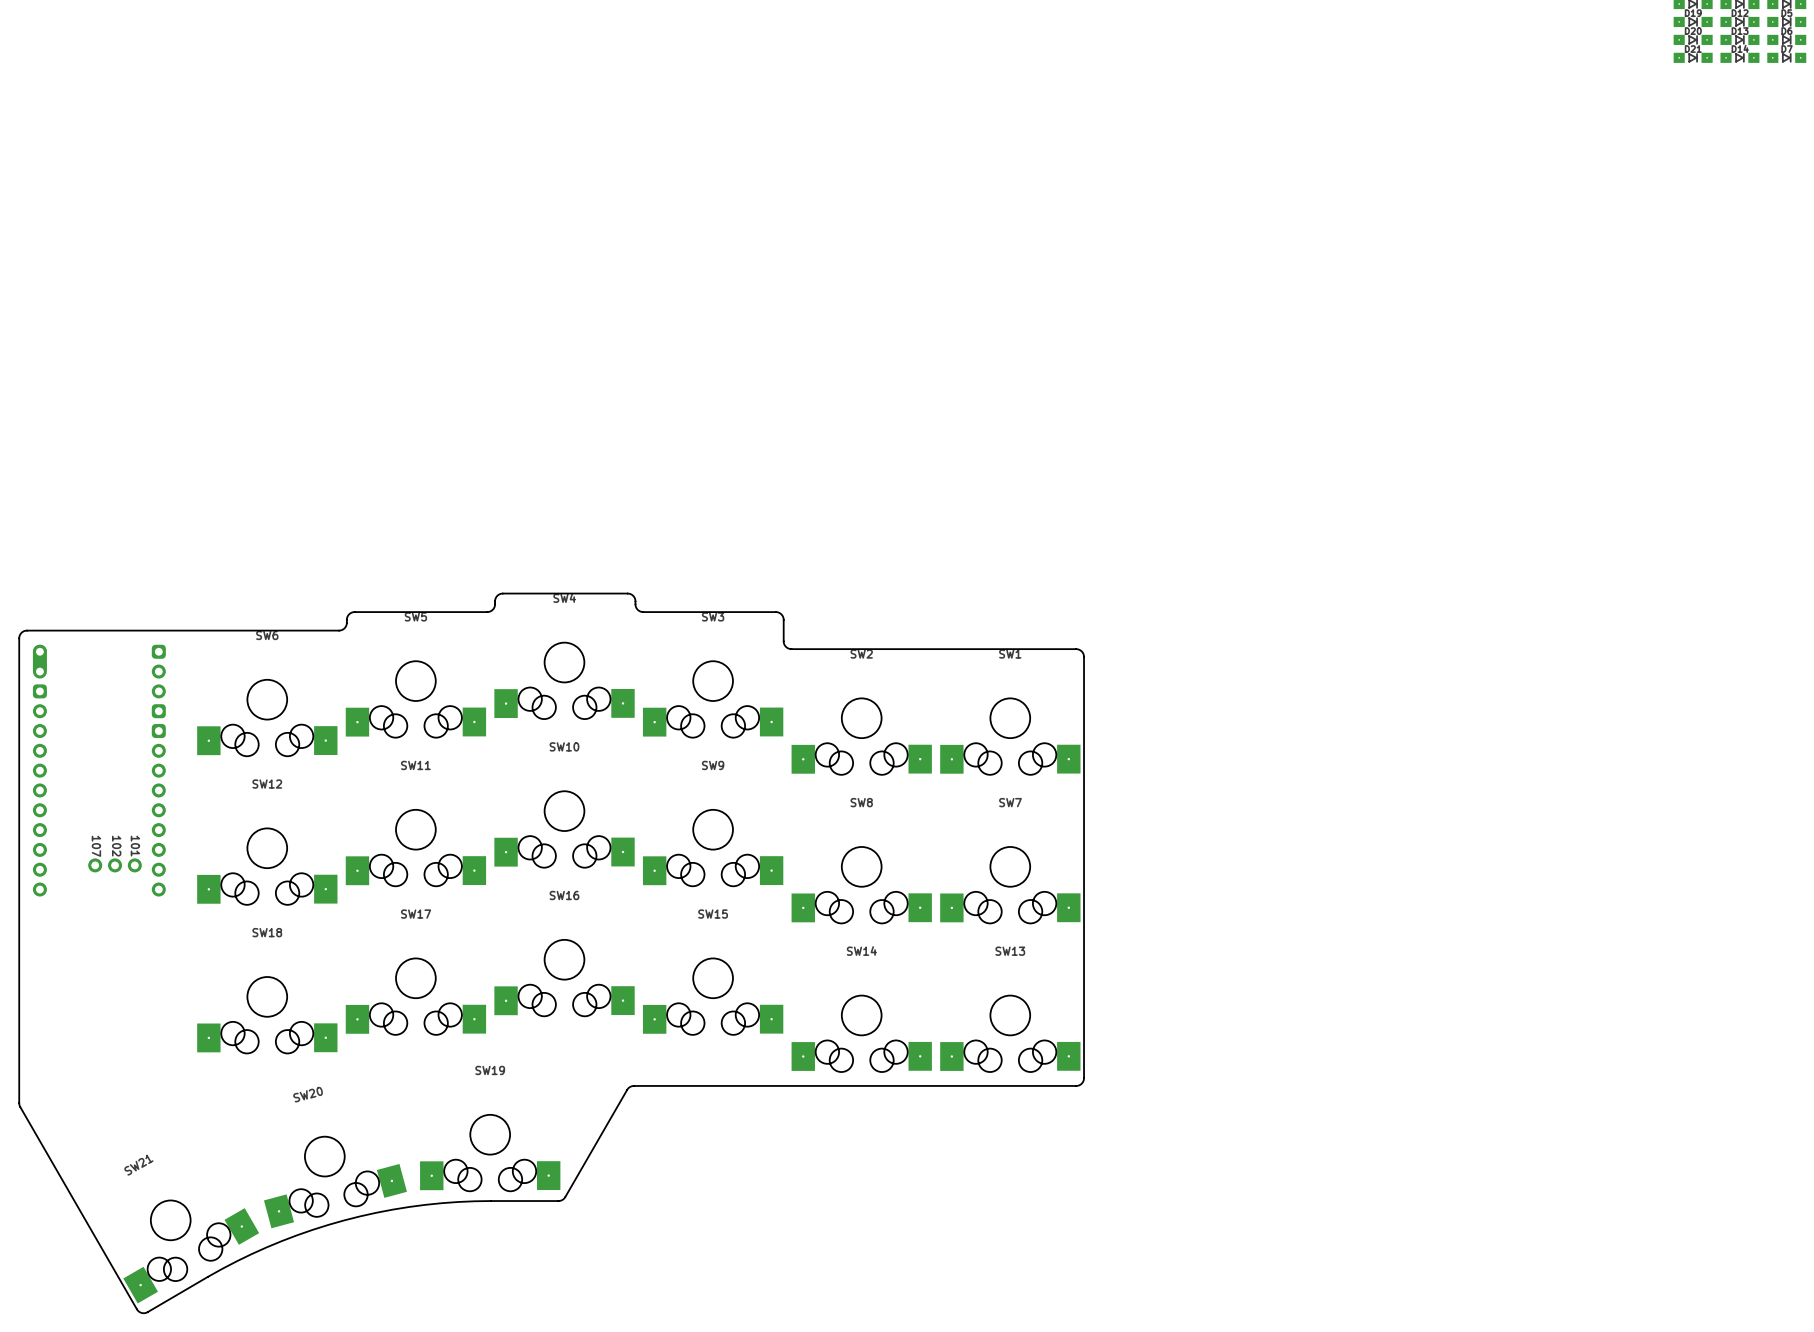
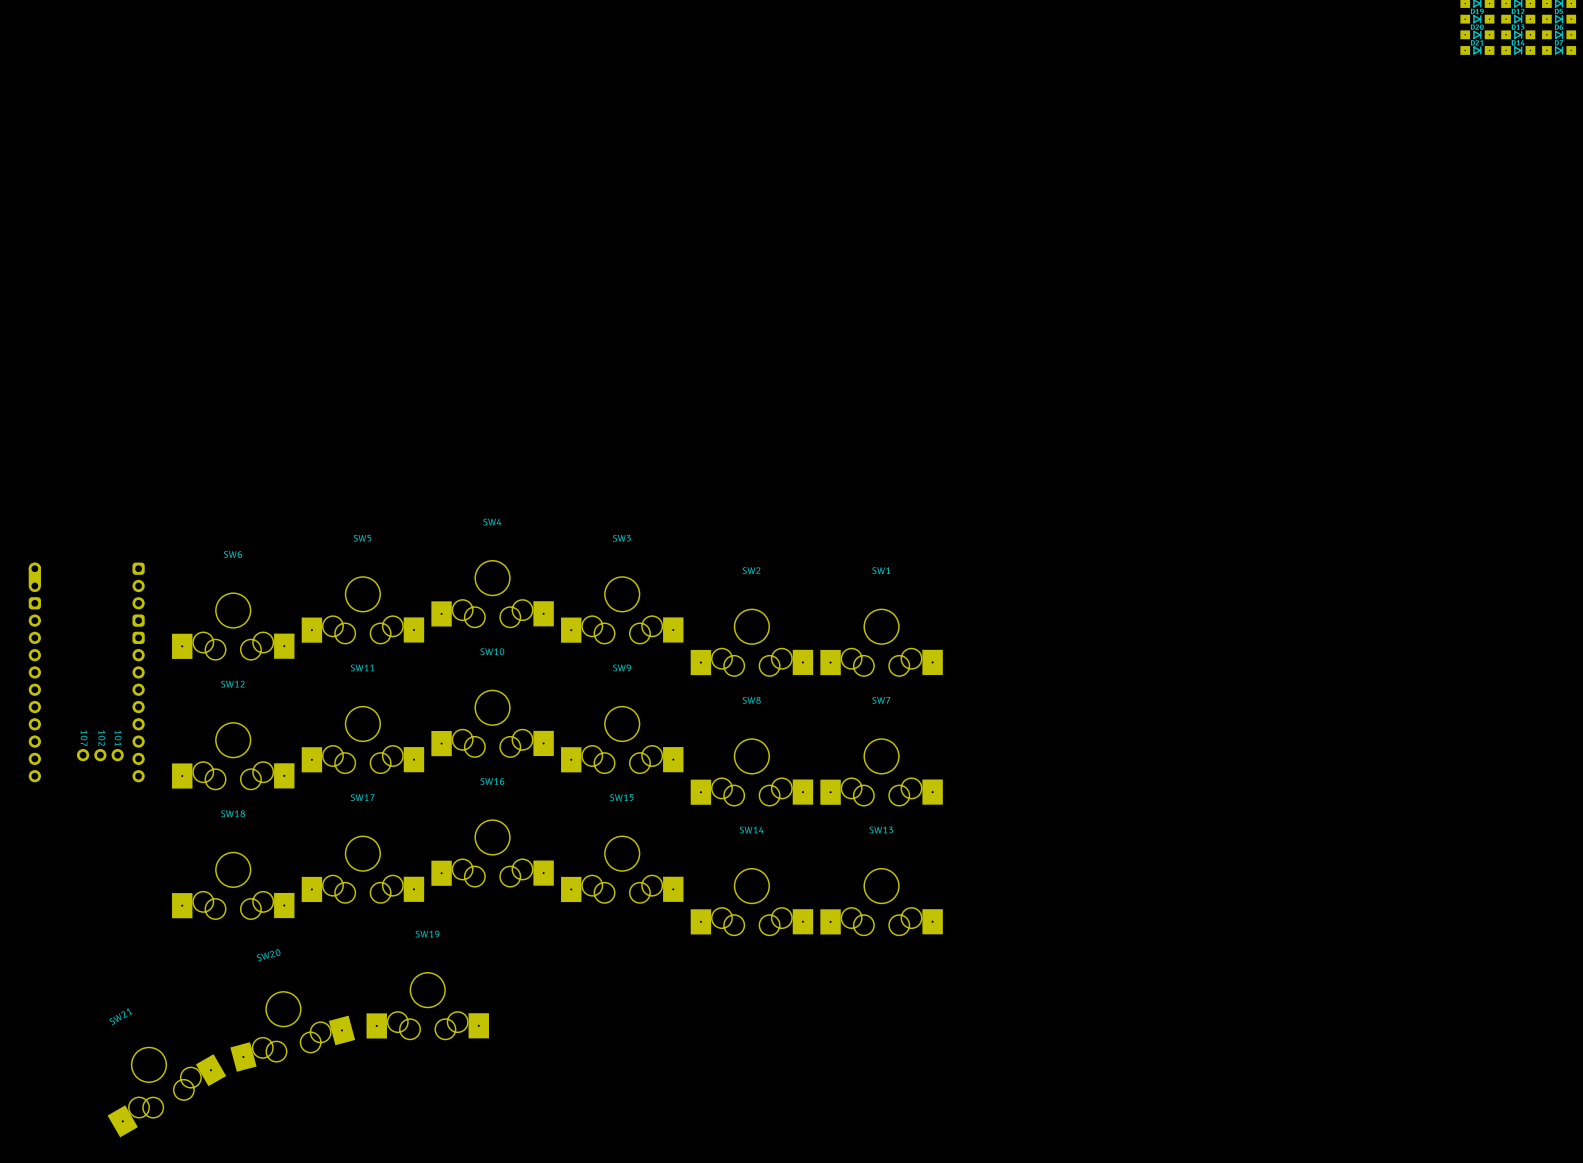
board edge: (627, 593) (501, 593) (496, 596) (493, 608) (488, 612) (353, 612) (348, 615) (345, 627) (339, 630) (27, 630) (20, 634) (19, 1104) (139, 1311) (147, 1312) (222, 1268) (266, 1247) (344, 1220) (392, 1209) (441, 1203) (561, 1200) (627, 1089) (632, 1086) (1076, 1085) (1082, 1082) (1084, 1078) (1084, 656) (1081, 651) (1076, 649) (790, 649) (784, 643) (783, 618) (778, 612) (642, 612) (636, 608) (633, 596) (627, 593) -> none

